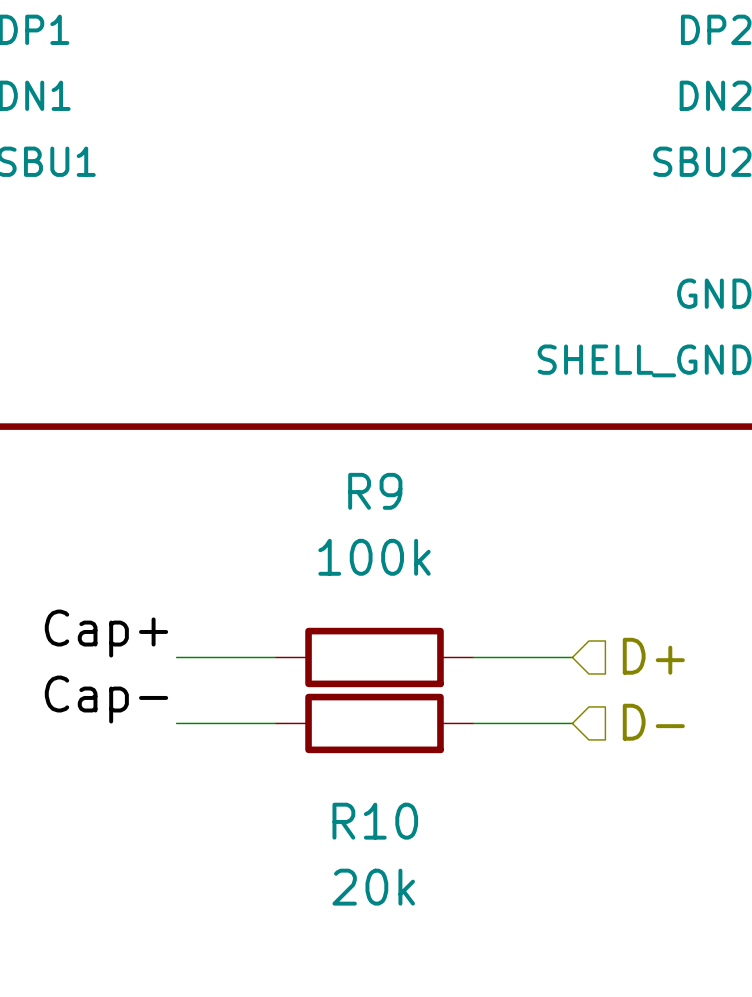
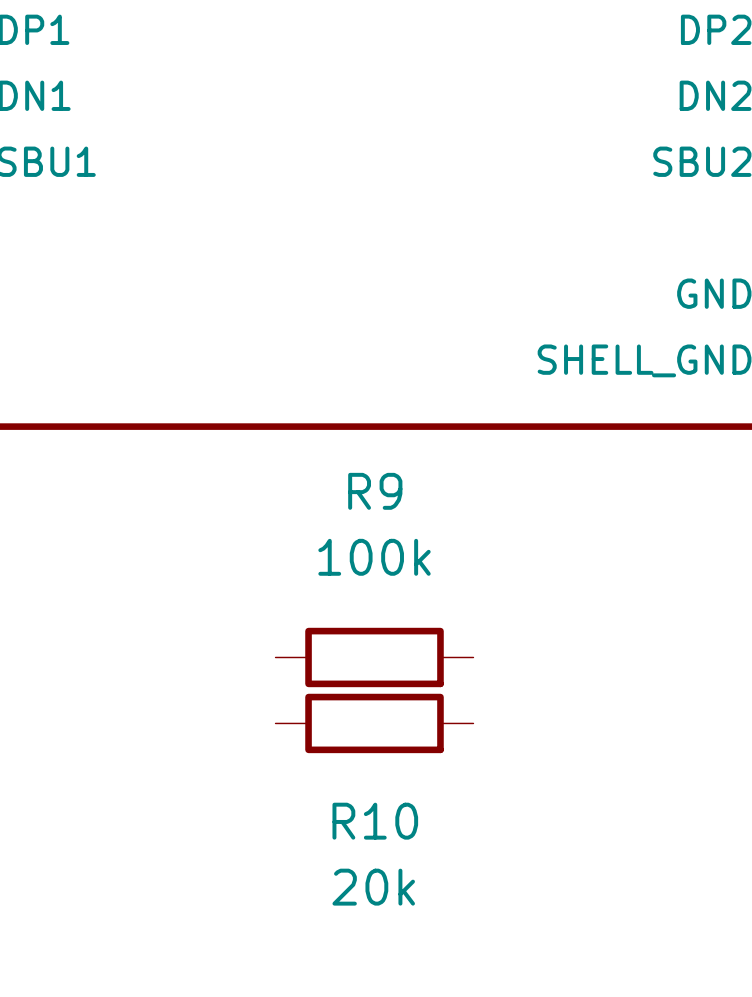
label: Cap+ (106, 633) -> none
hierarchical label: D+ (653, 656) -> none
wire: (176, 657) (275, 657) -> none
wire: (473, 657) (572, 657) -> none
label: Cap- (106, 699) -> none
hierarchical label: D- (653, 722) -> none
wire: (176, 723) (275, 723) -> none
wire: (473, 723) (572, 723) -> none

